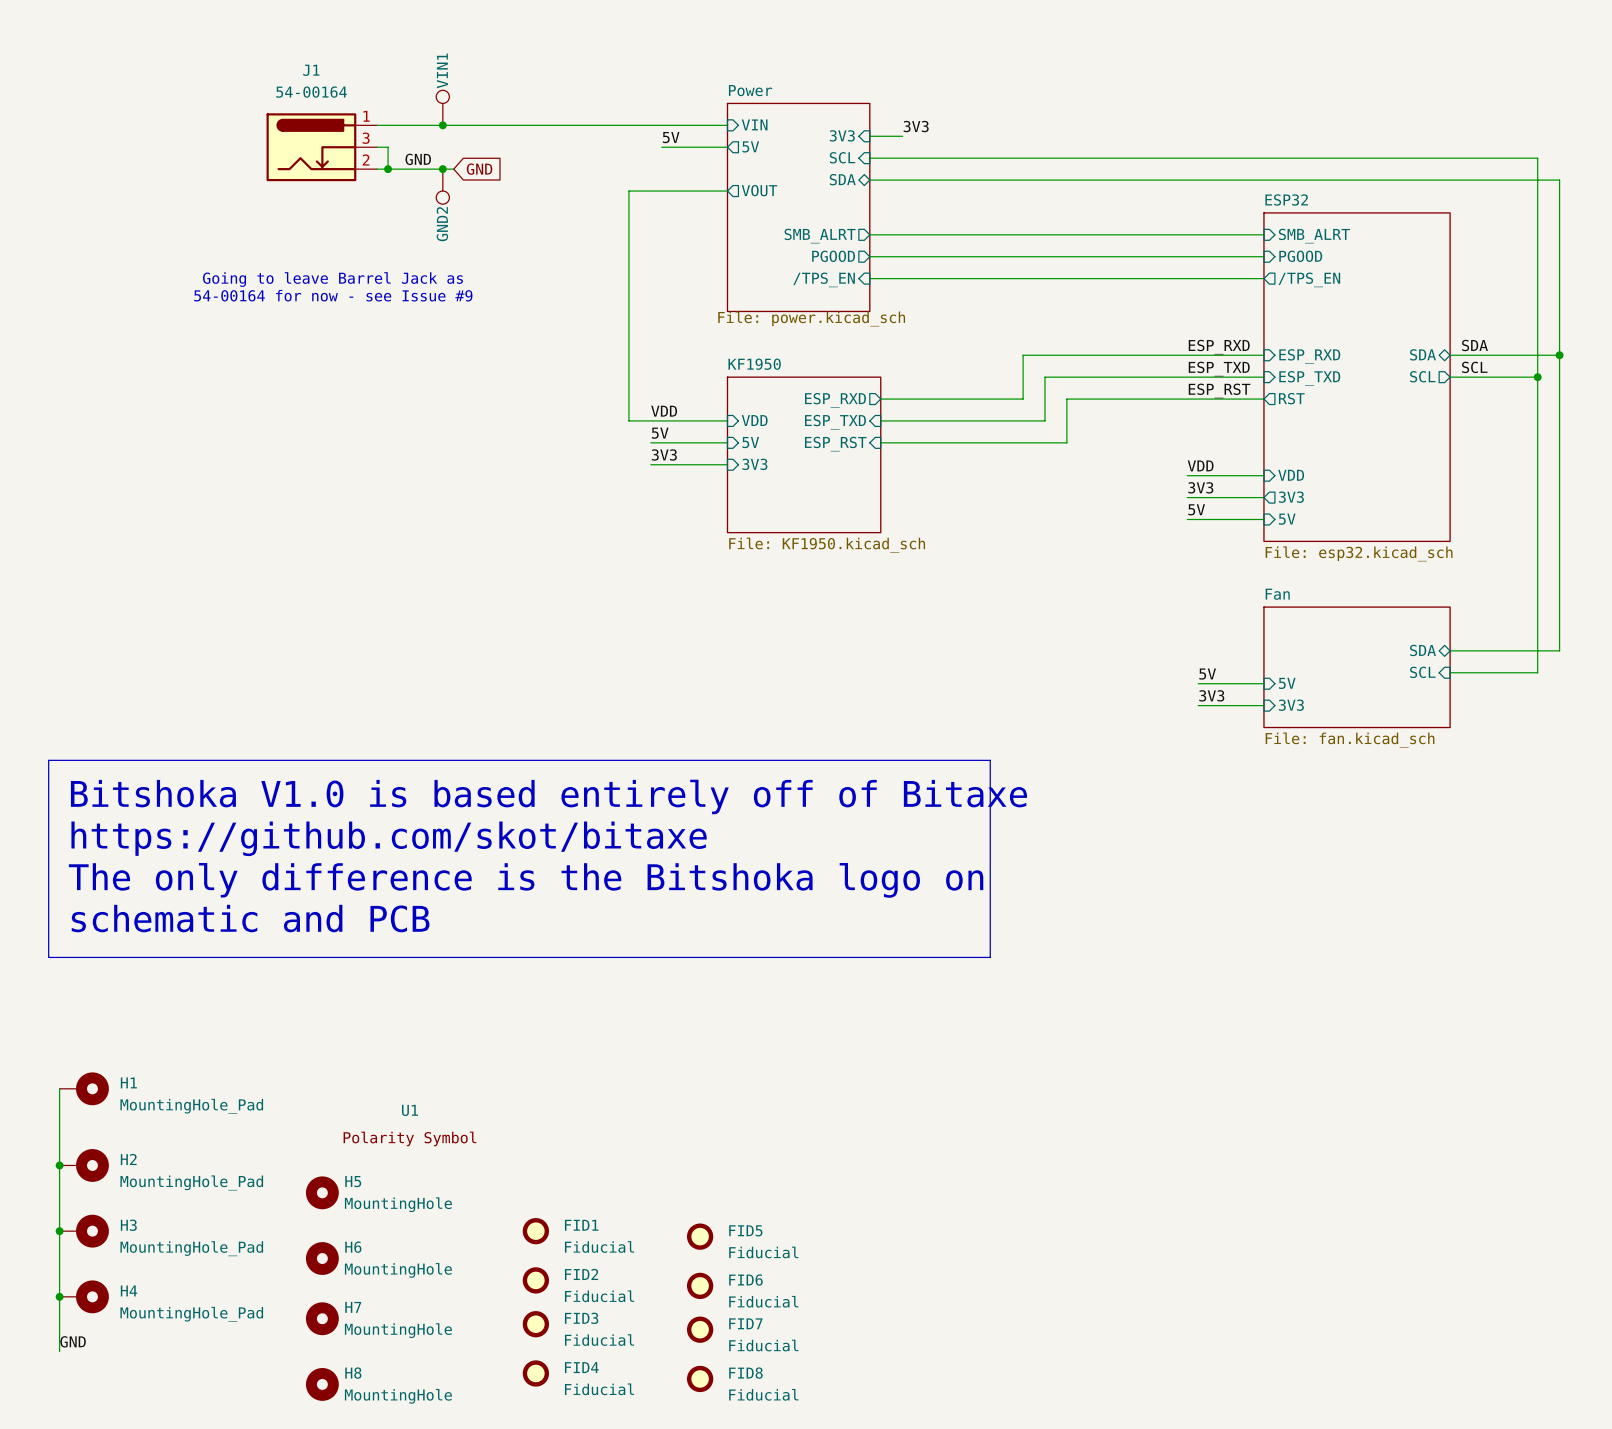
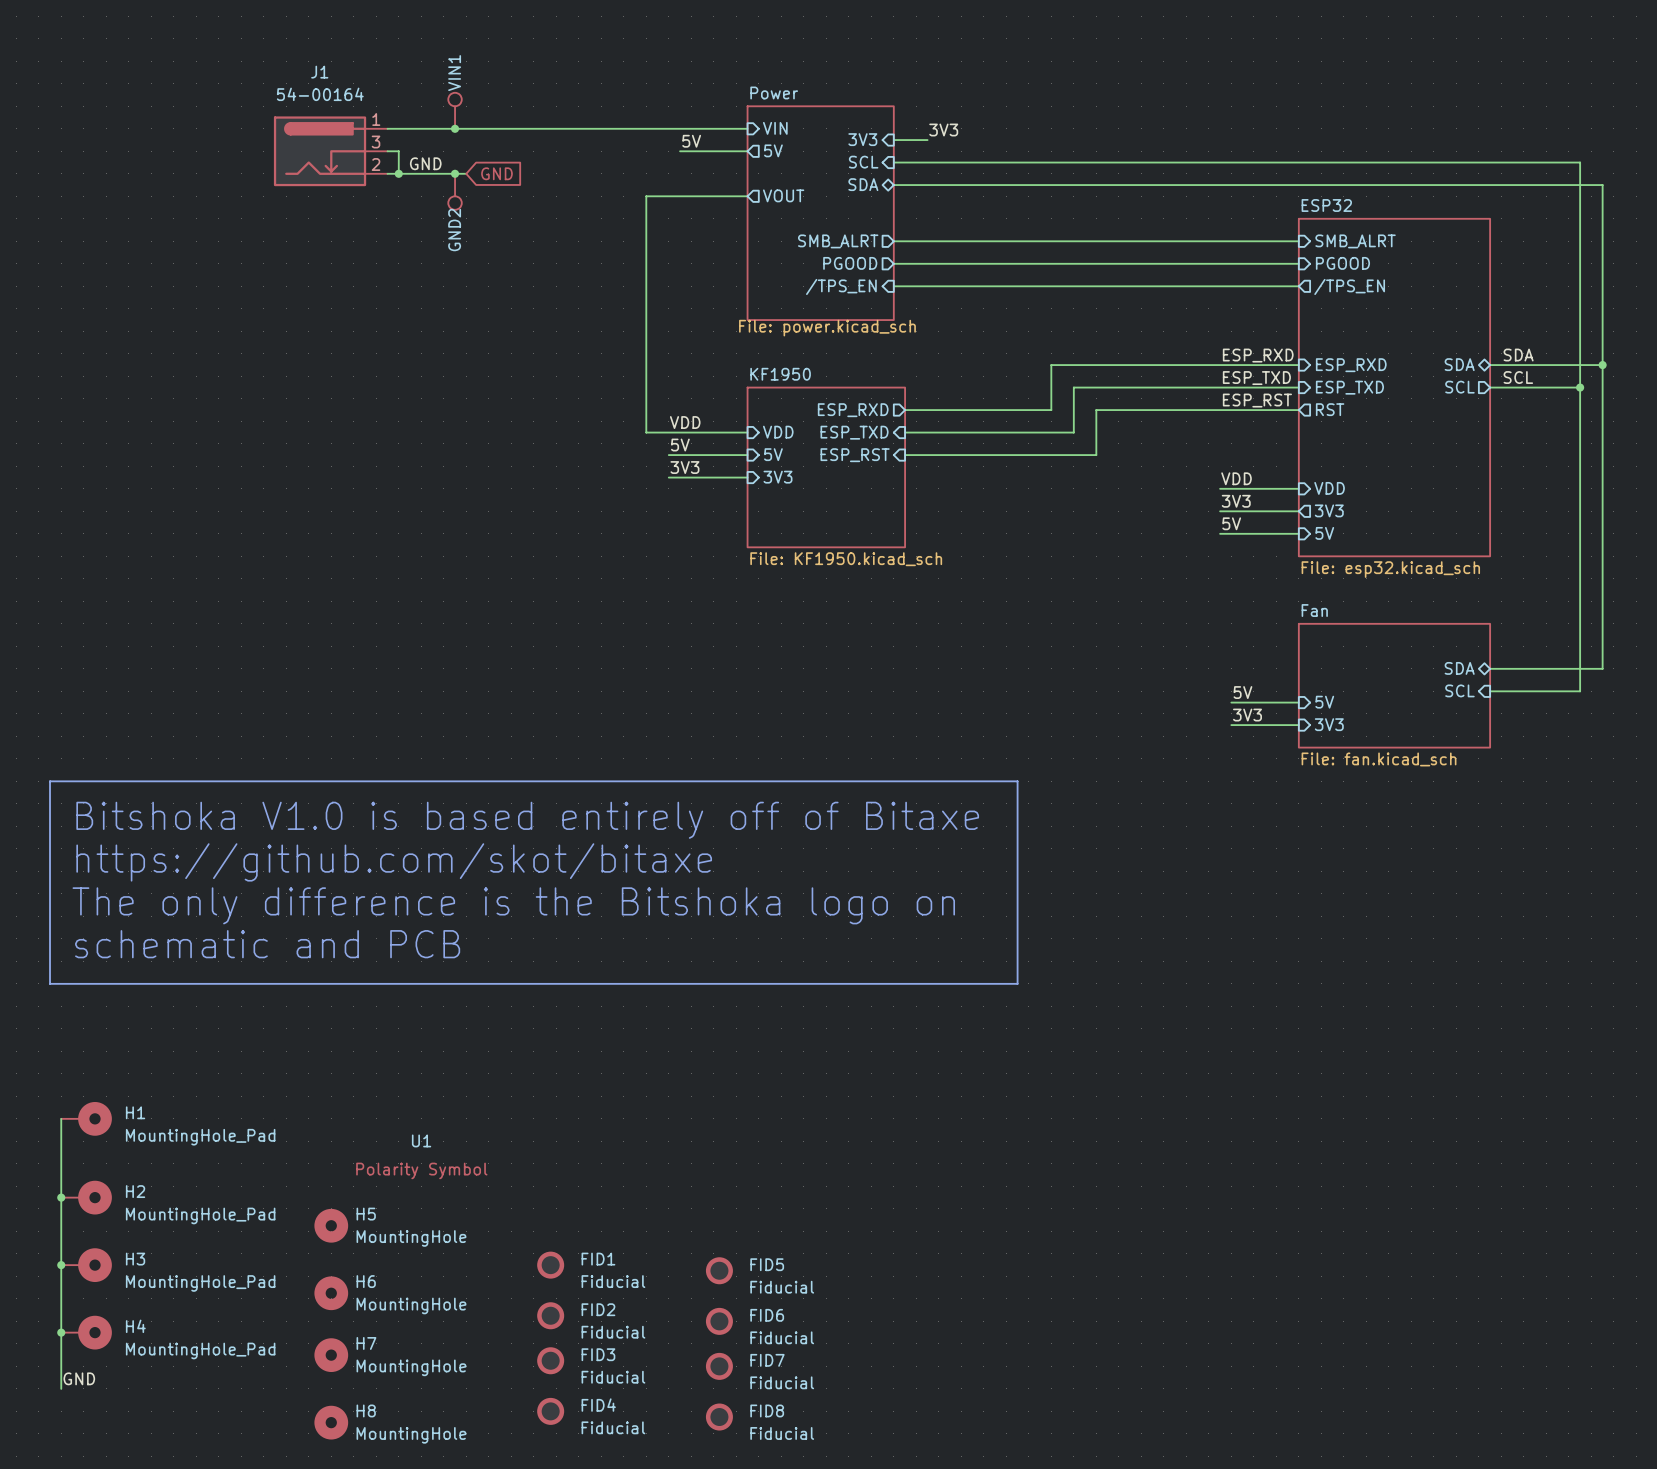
text: Going to leave Barrel Jack as (332, 279) -> none
text: 54-00164 for now - see Issue #9 (333, 295) -> none

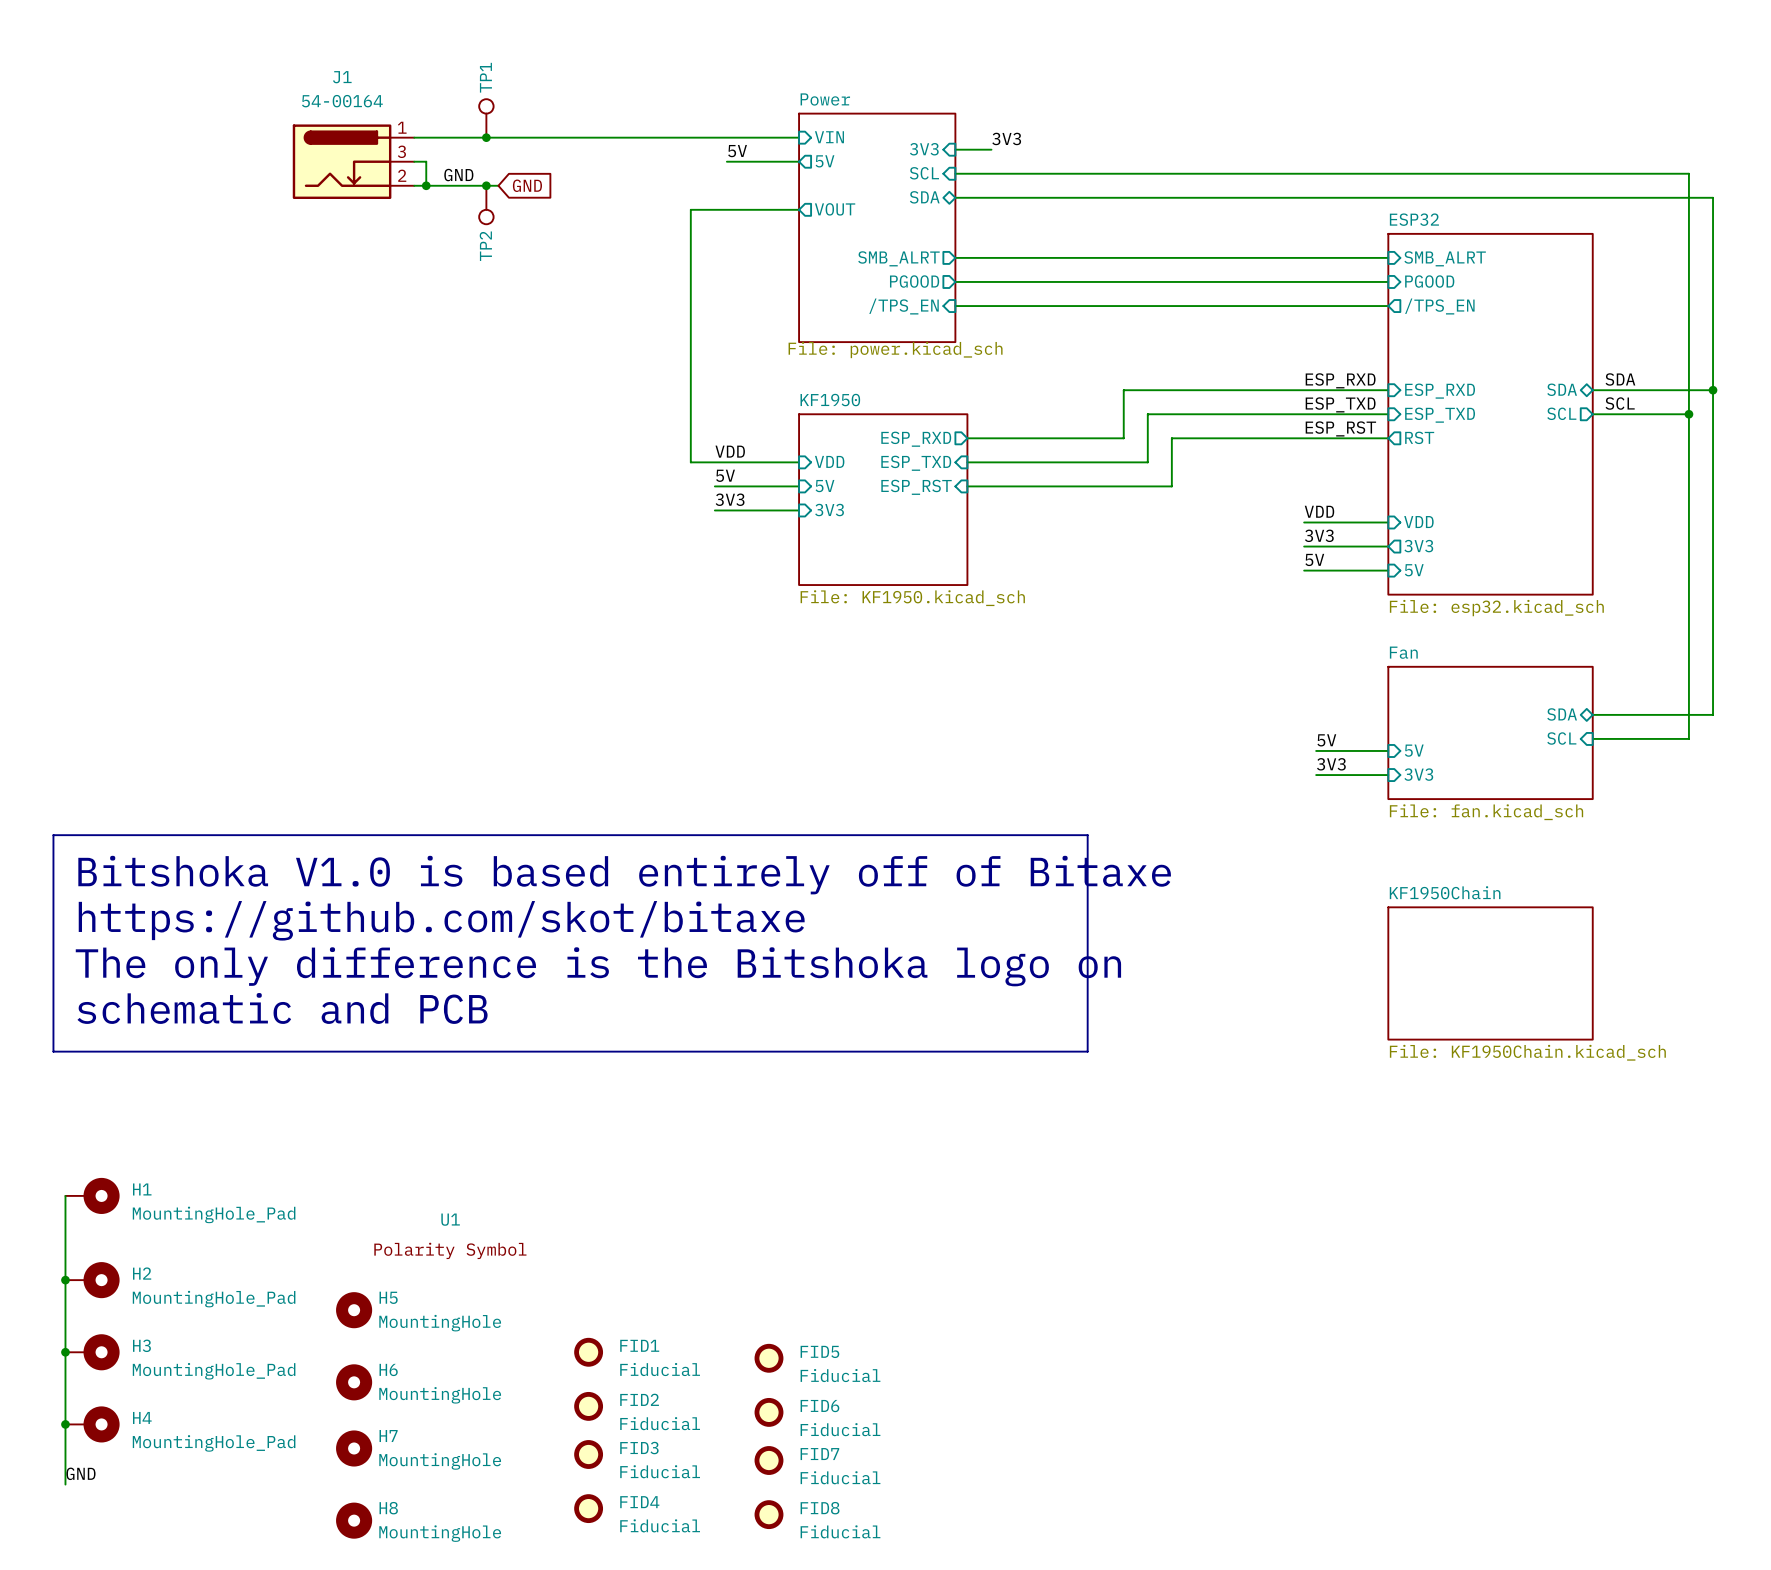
VIN1 name: VIN1 (454, 73) -> TP1 (485, 77)
GND2 name: GND2 (454, 230) -> TP2 (485, 246)
sheet KF1950Chain: none -> File: KF1950Chain.kicad_sch (1490, 973)

